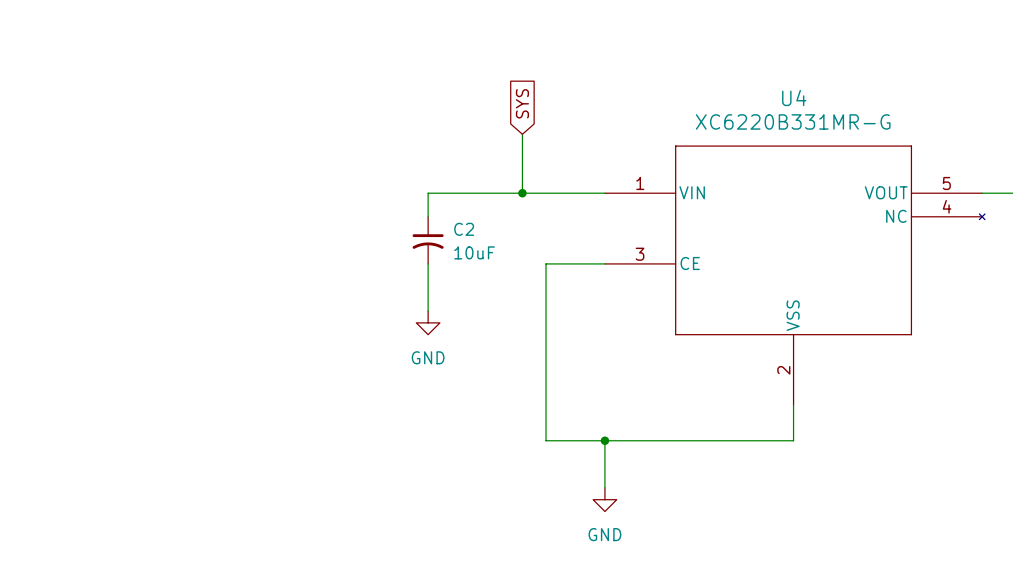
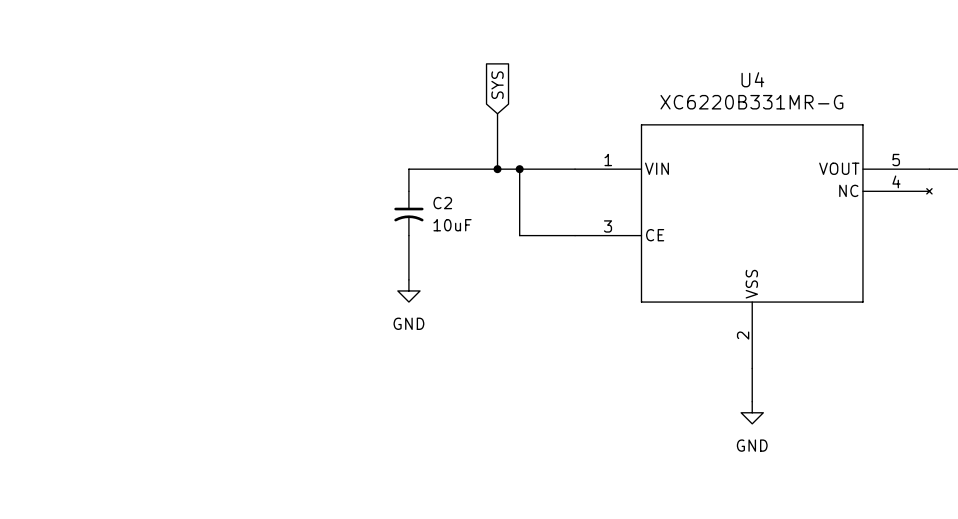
junction: none -> (519, 169)
wire: (546, 263) (546, 440) (793, 440) -> (519, 235) (519, 169)
wire: (604, 440) (604, 487) -> none
junction: (604, 440) -> none
power symbol position: GND (604, 499) -> GND (752, 412)

